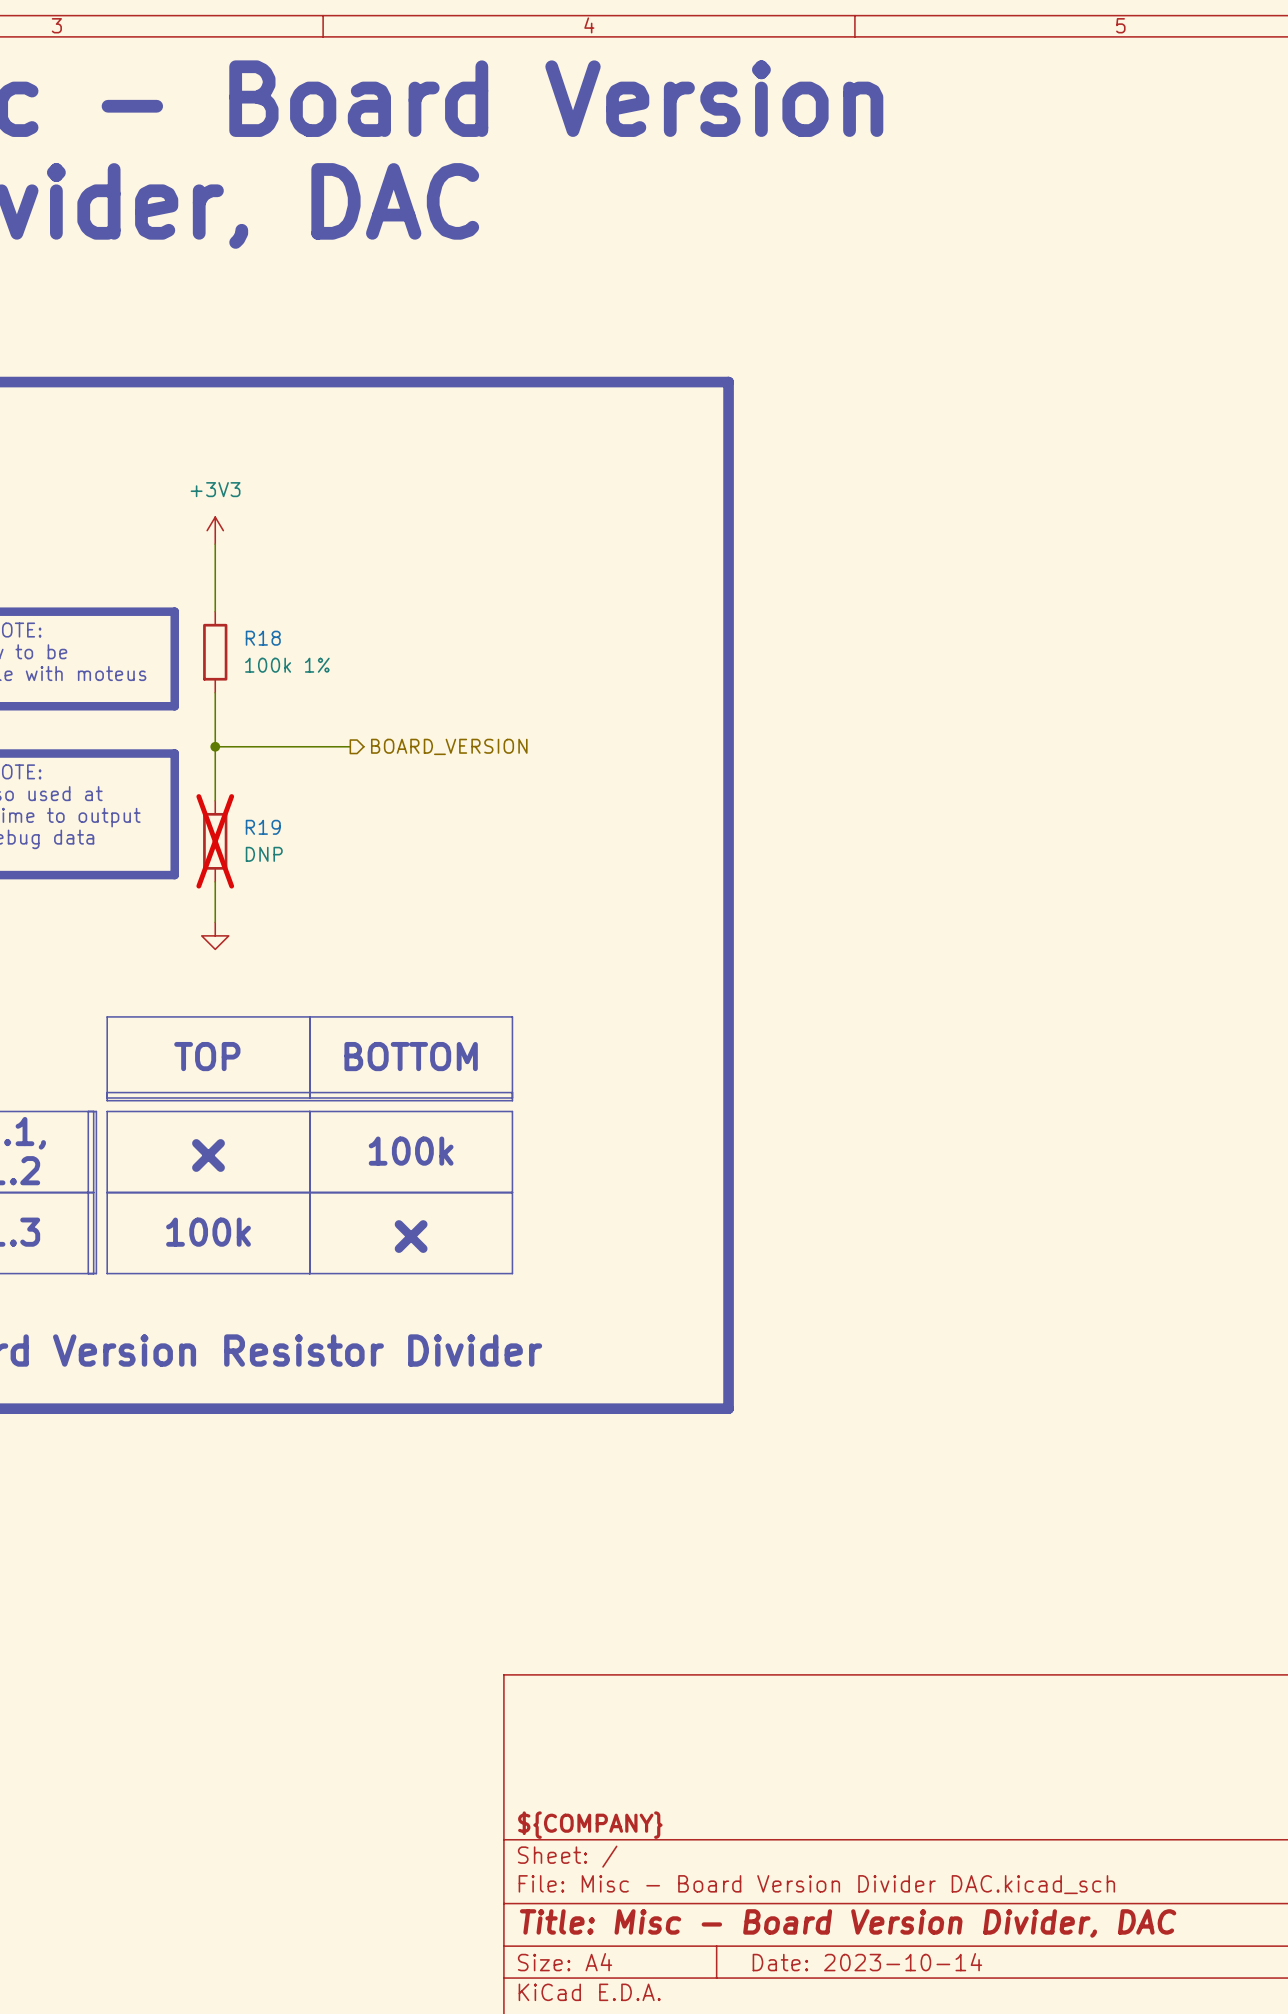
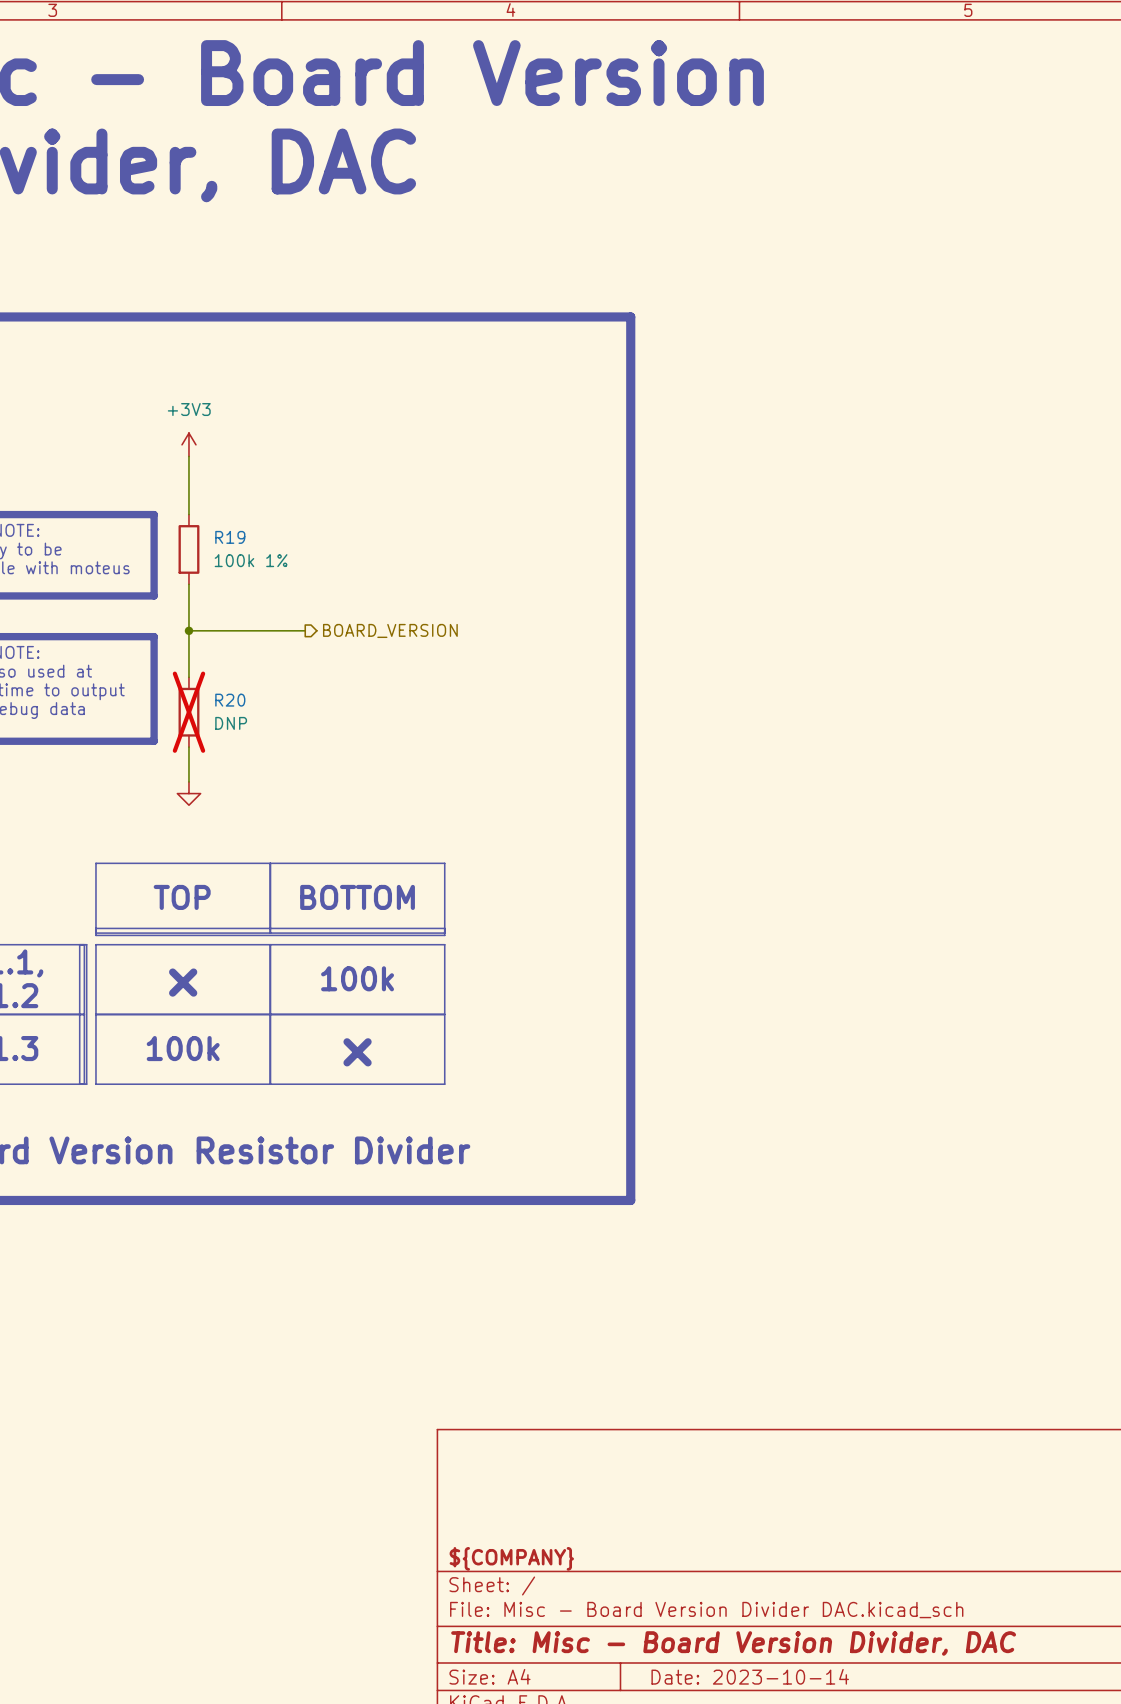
R18 name: R18 (263, 638) -> R19 (230, 537)
R19 name: R19 (263, 827) -> R20 (230, 700)

